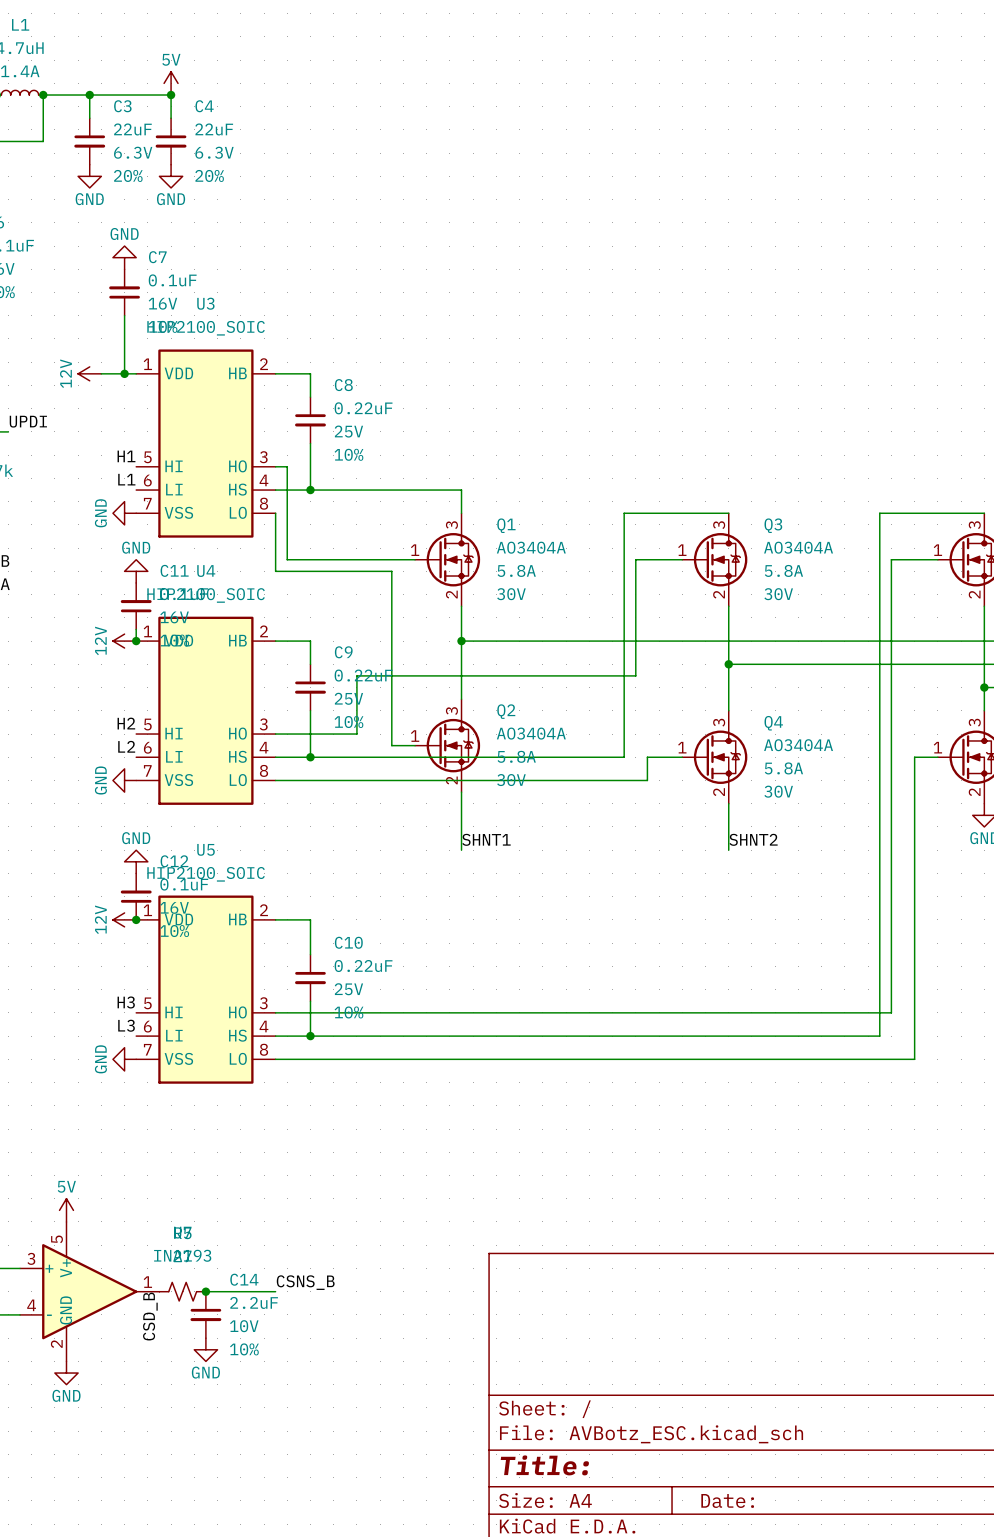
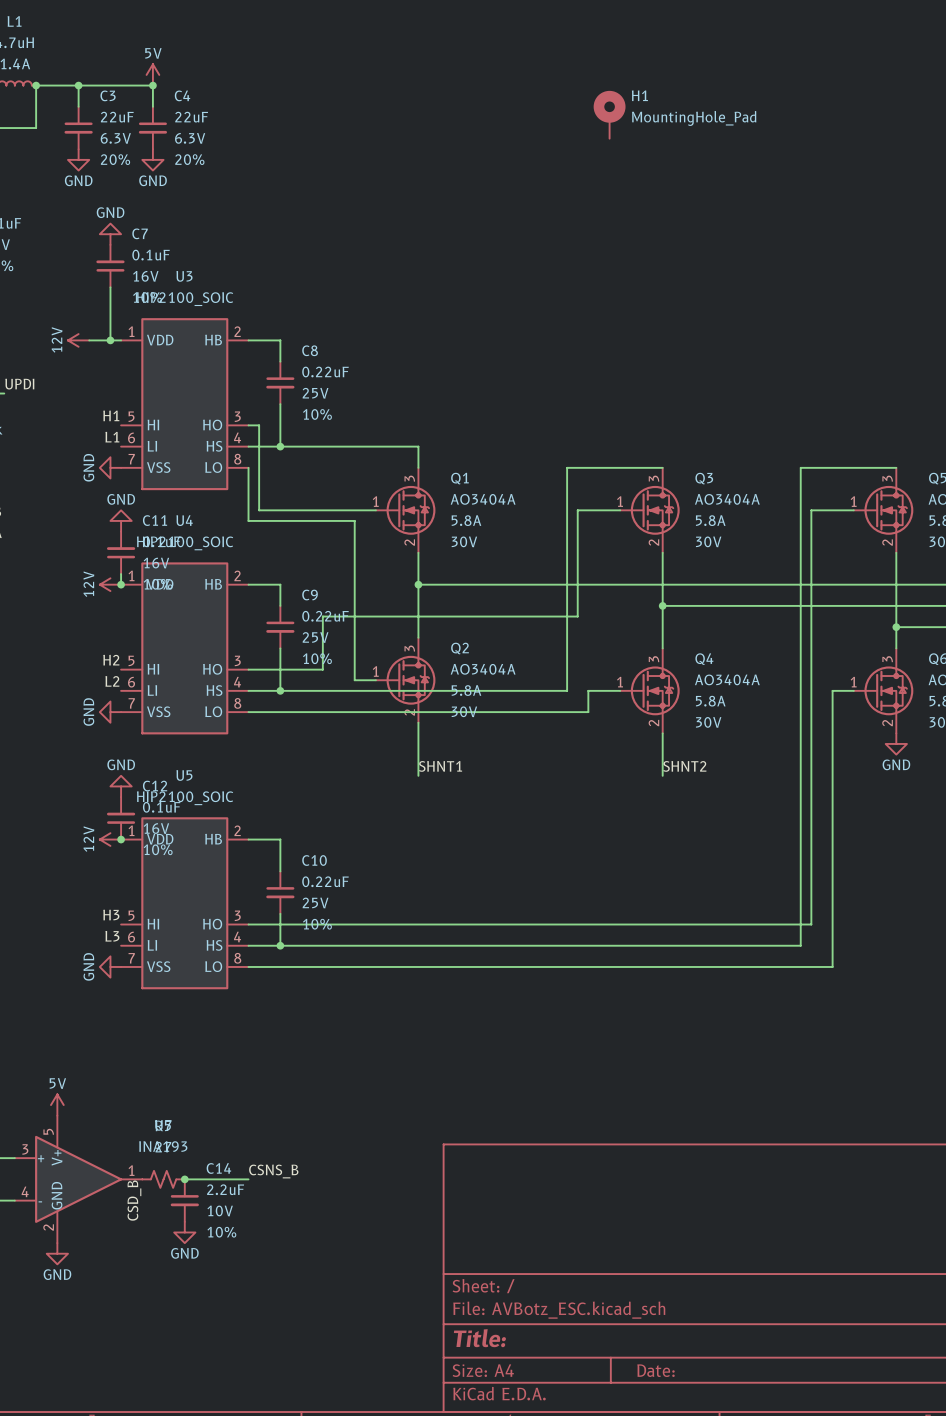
H1: none -> MountingHole_Pad (609, 114)

